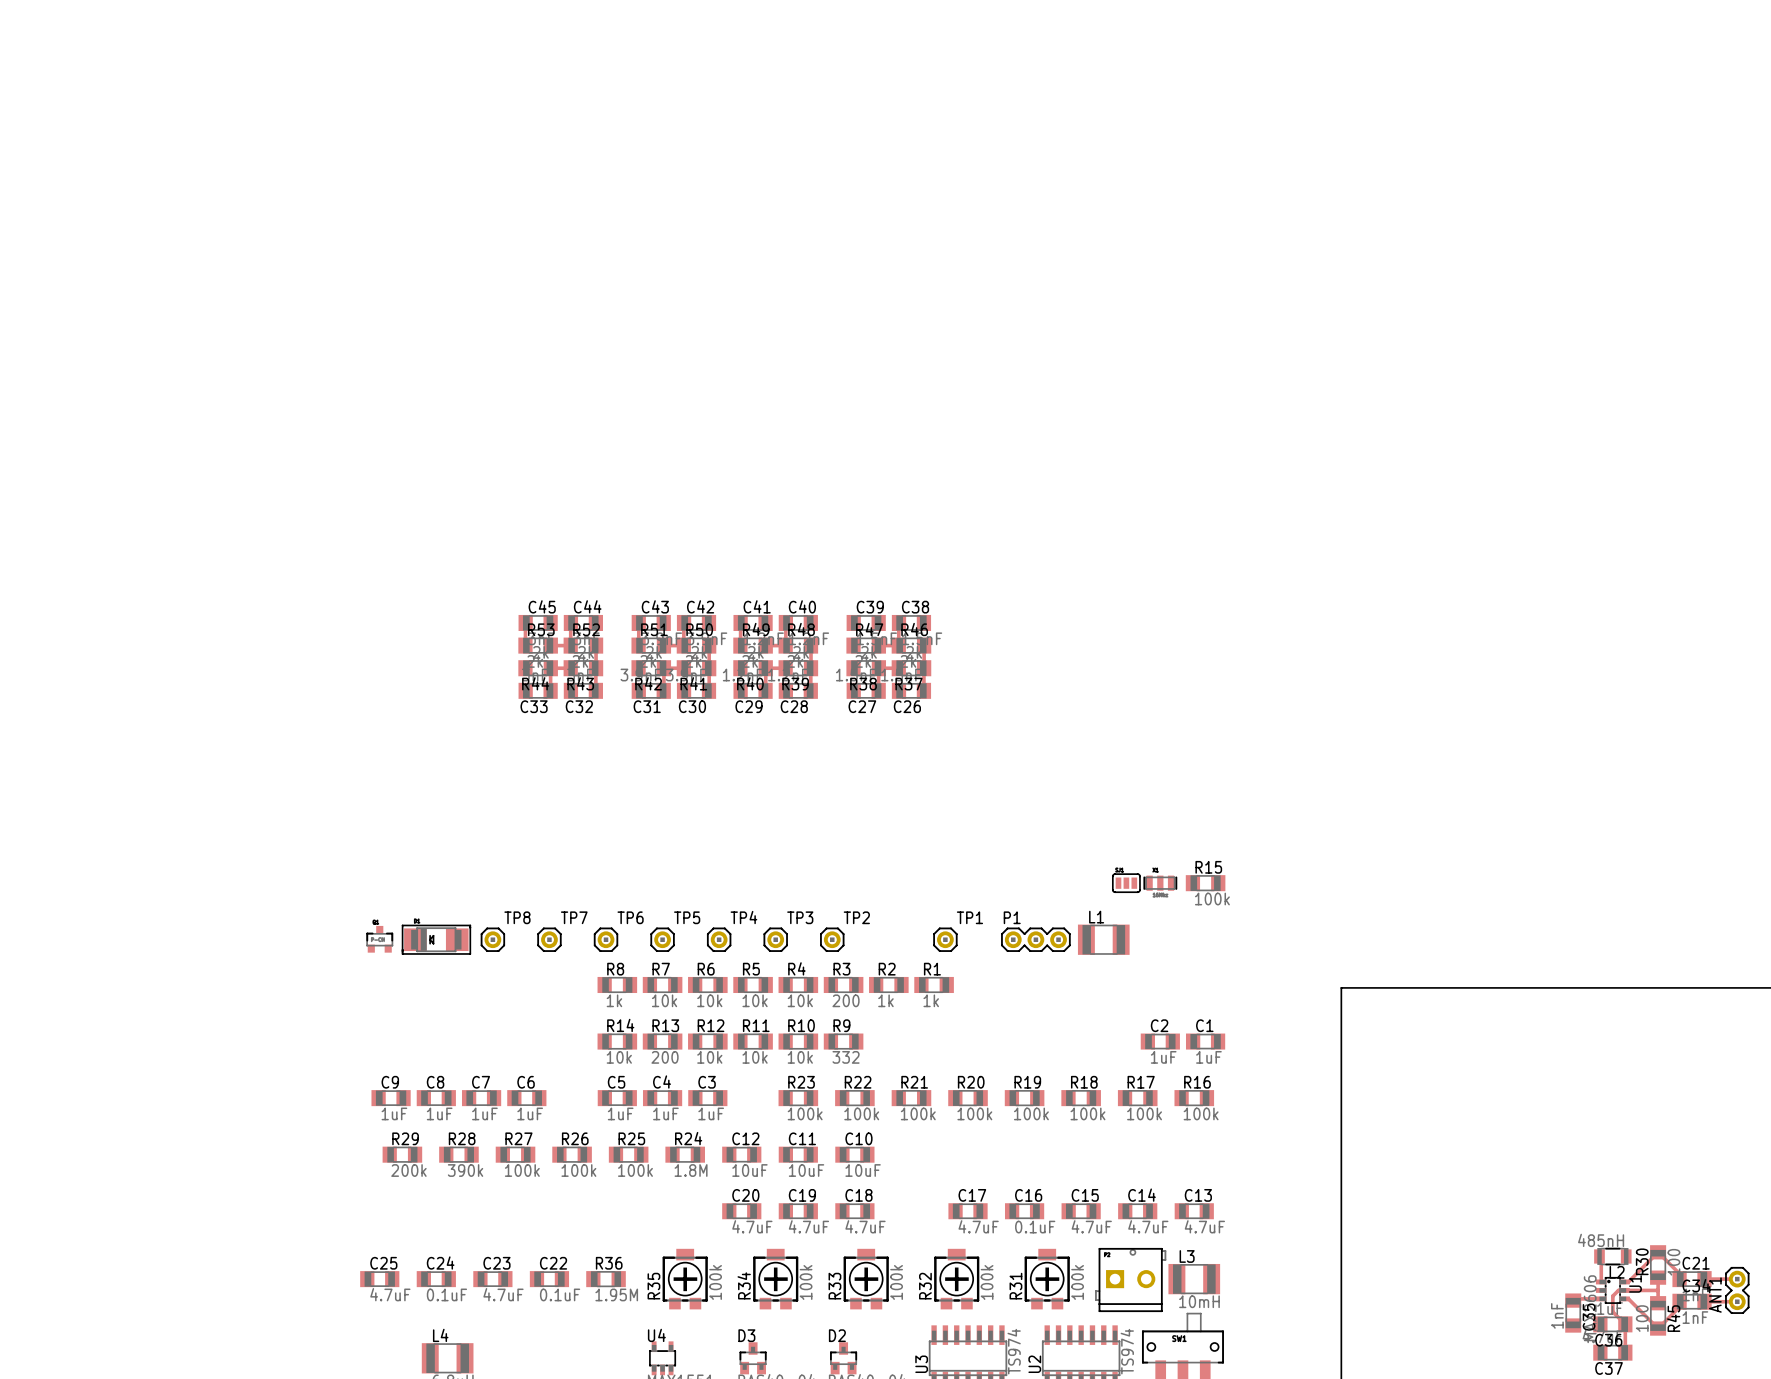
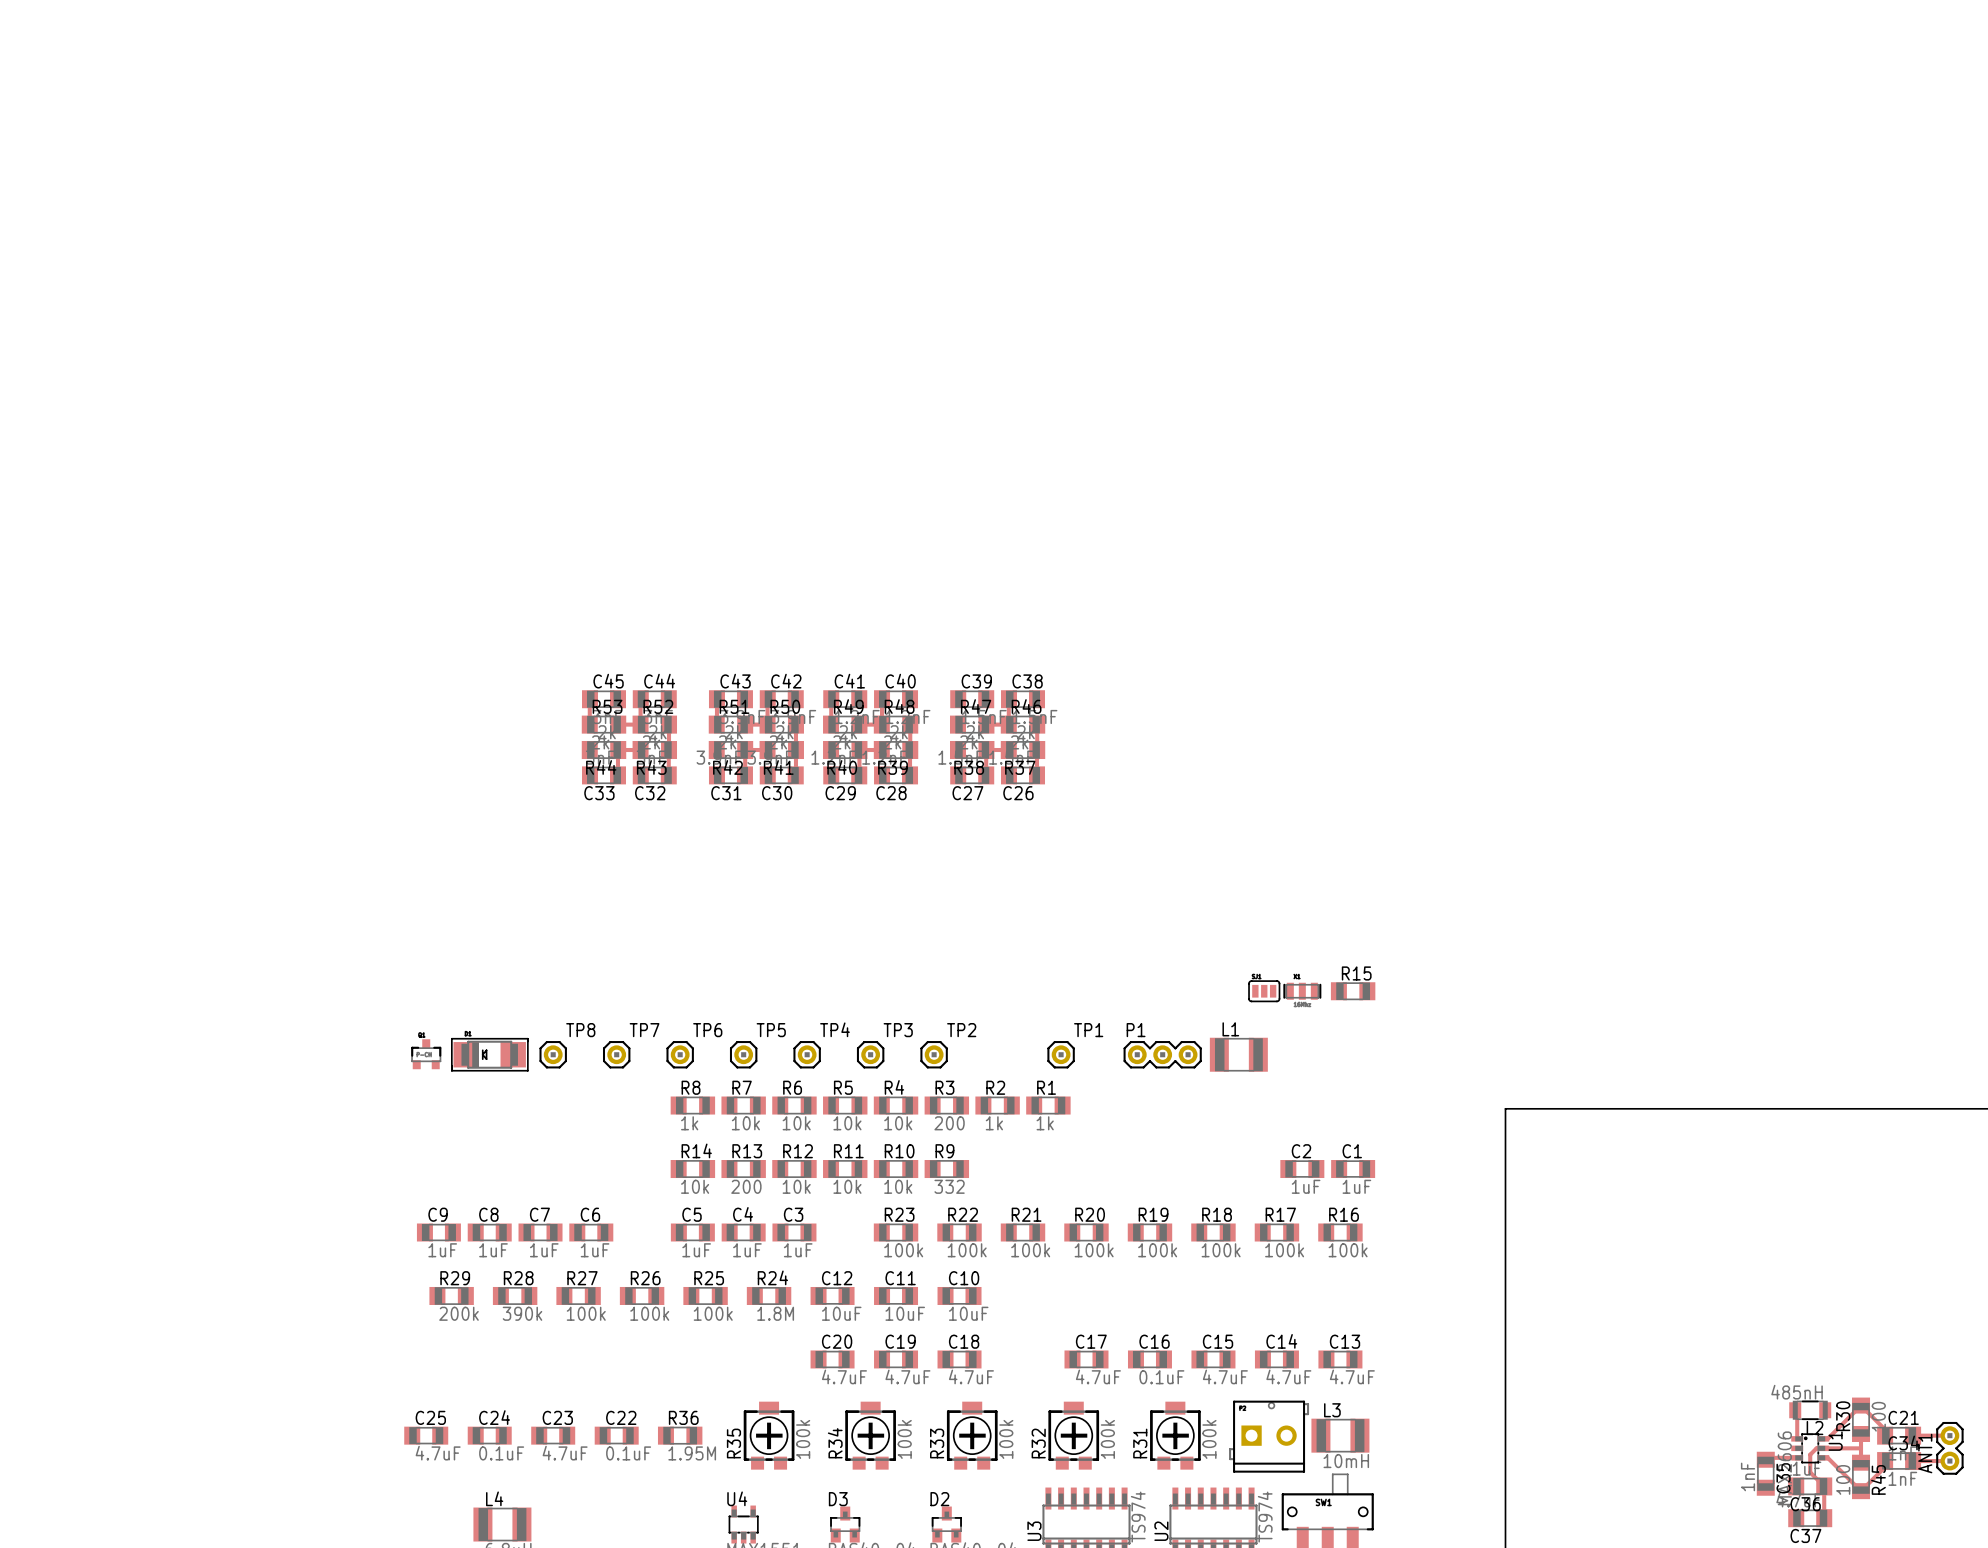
R15 value: 100k (1212, 899) -> none

